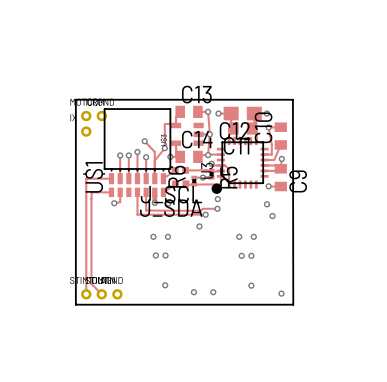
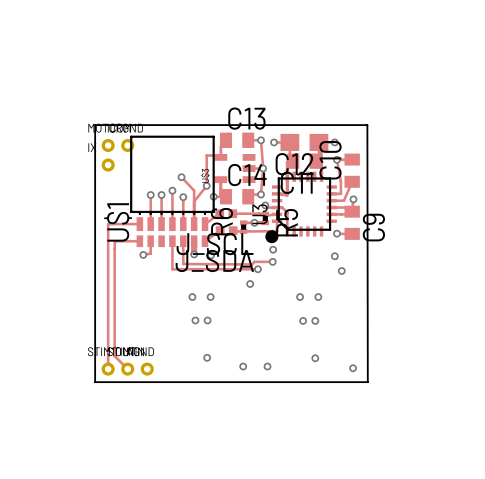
track: none -> (287, 162) (287, 195) (277, 193) (287, 195) (287, 176)
track: (220, 154) (208, 155) -> none

